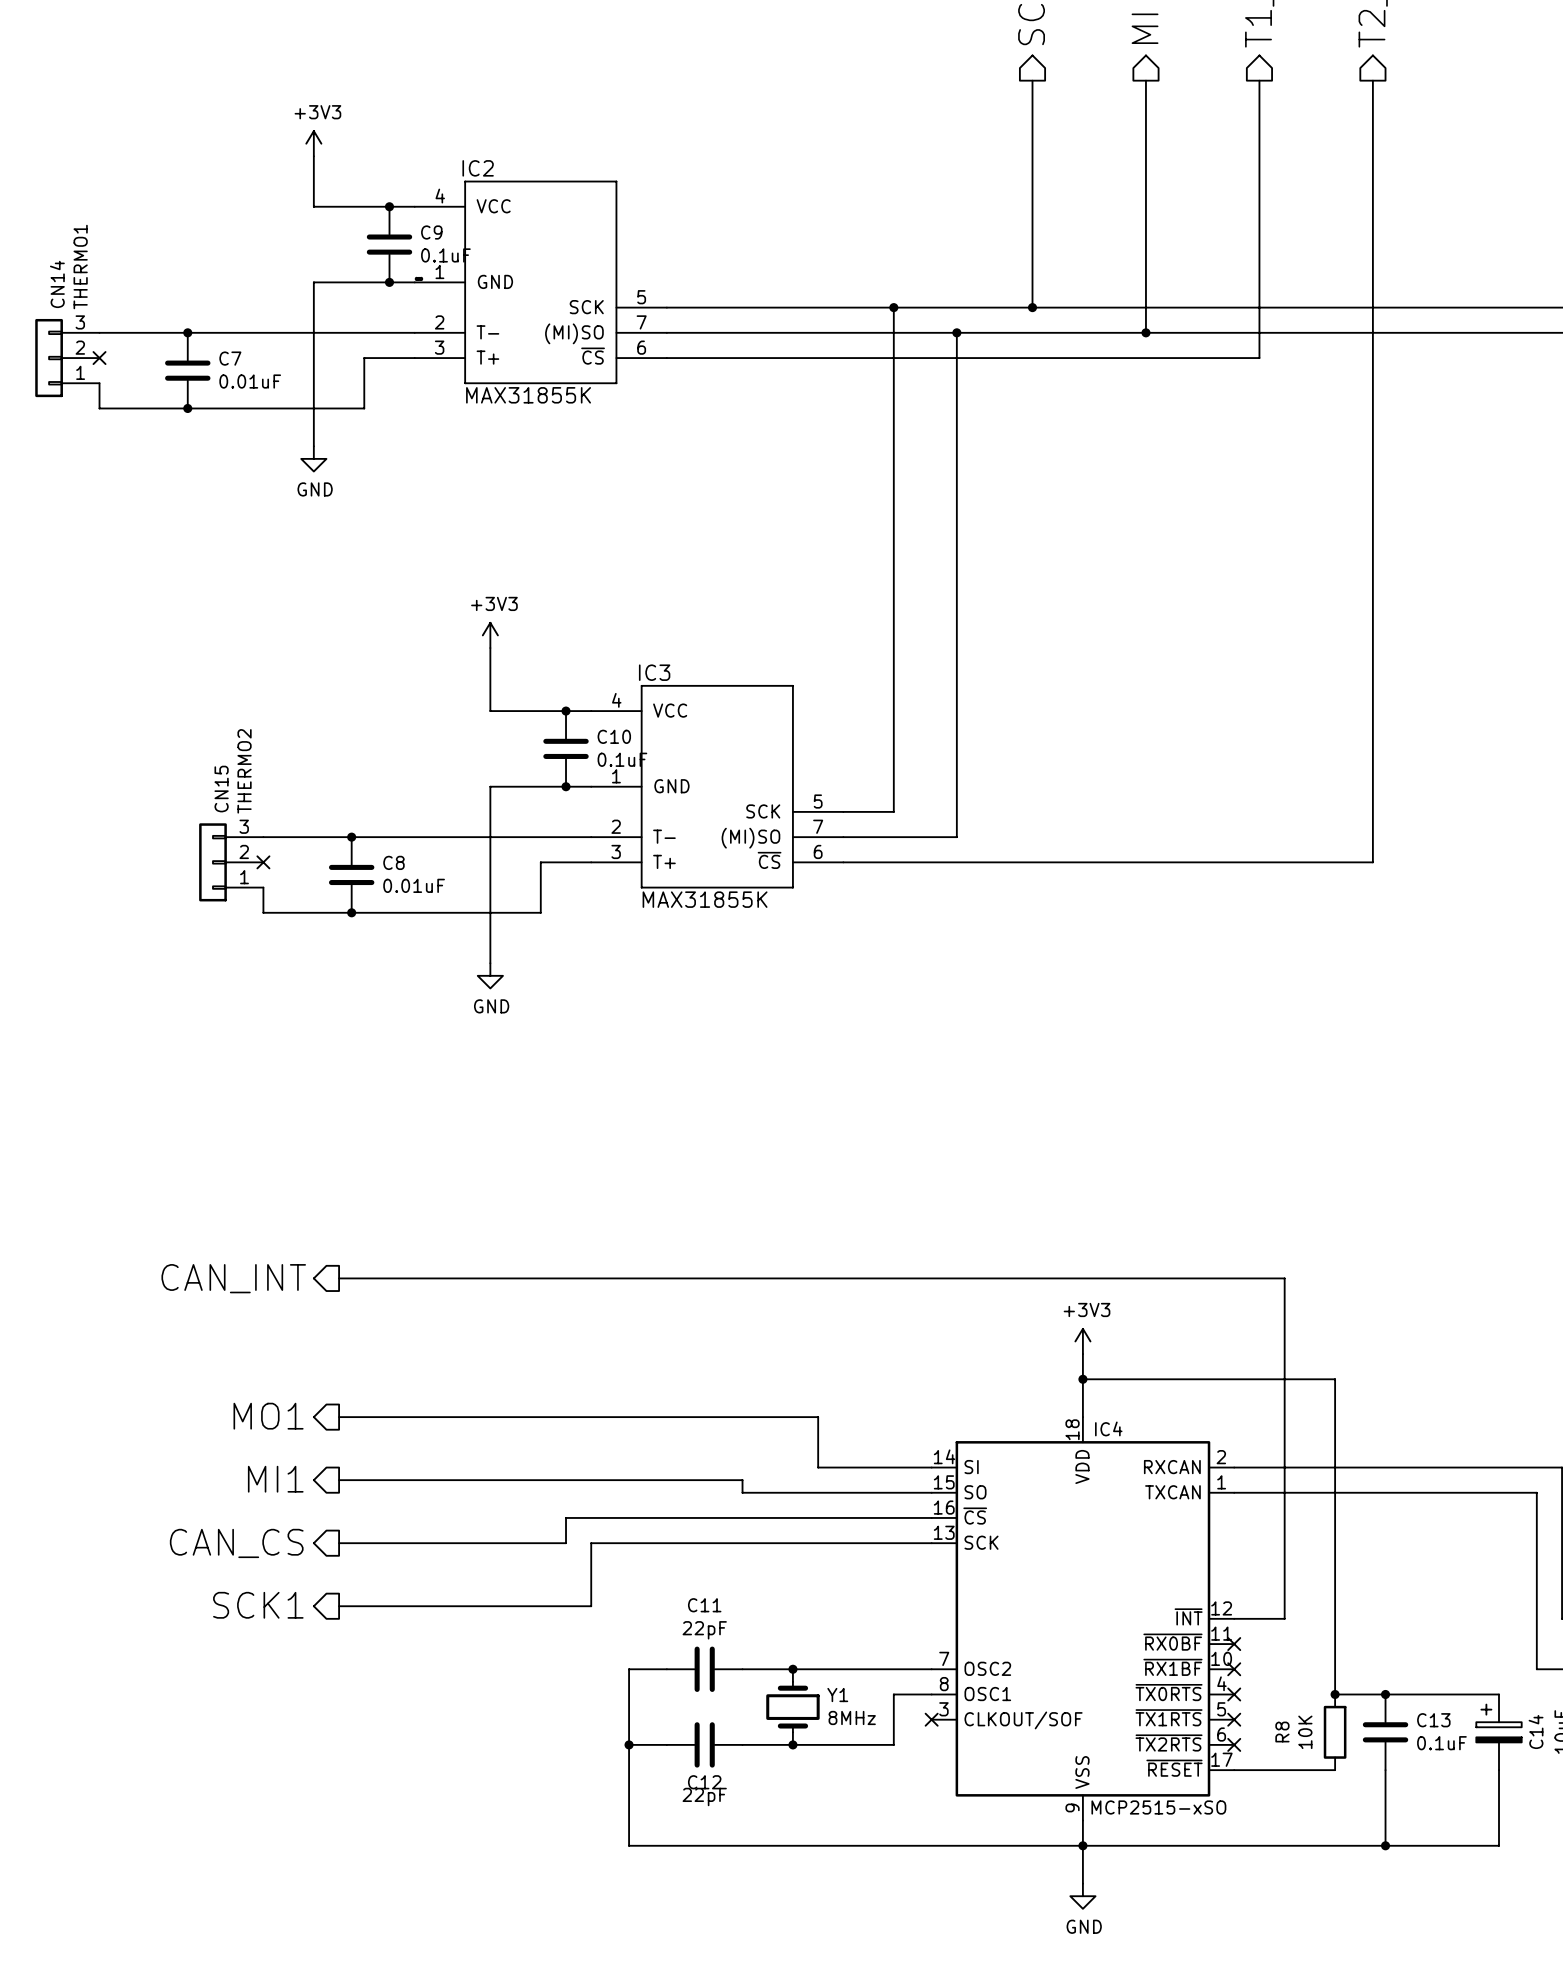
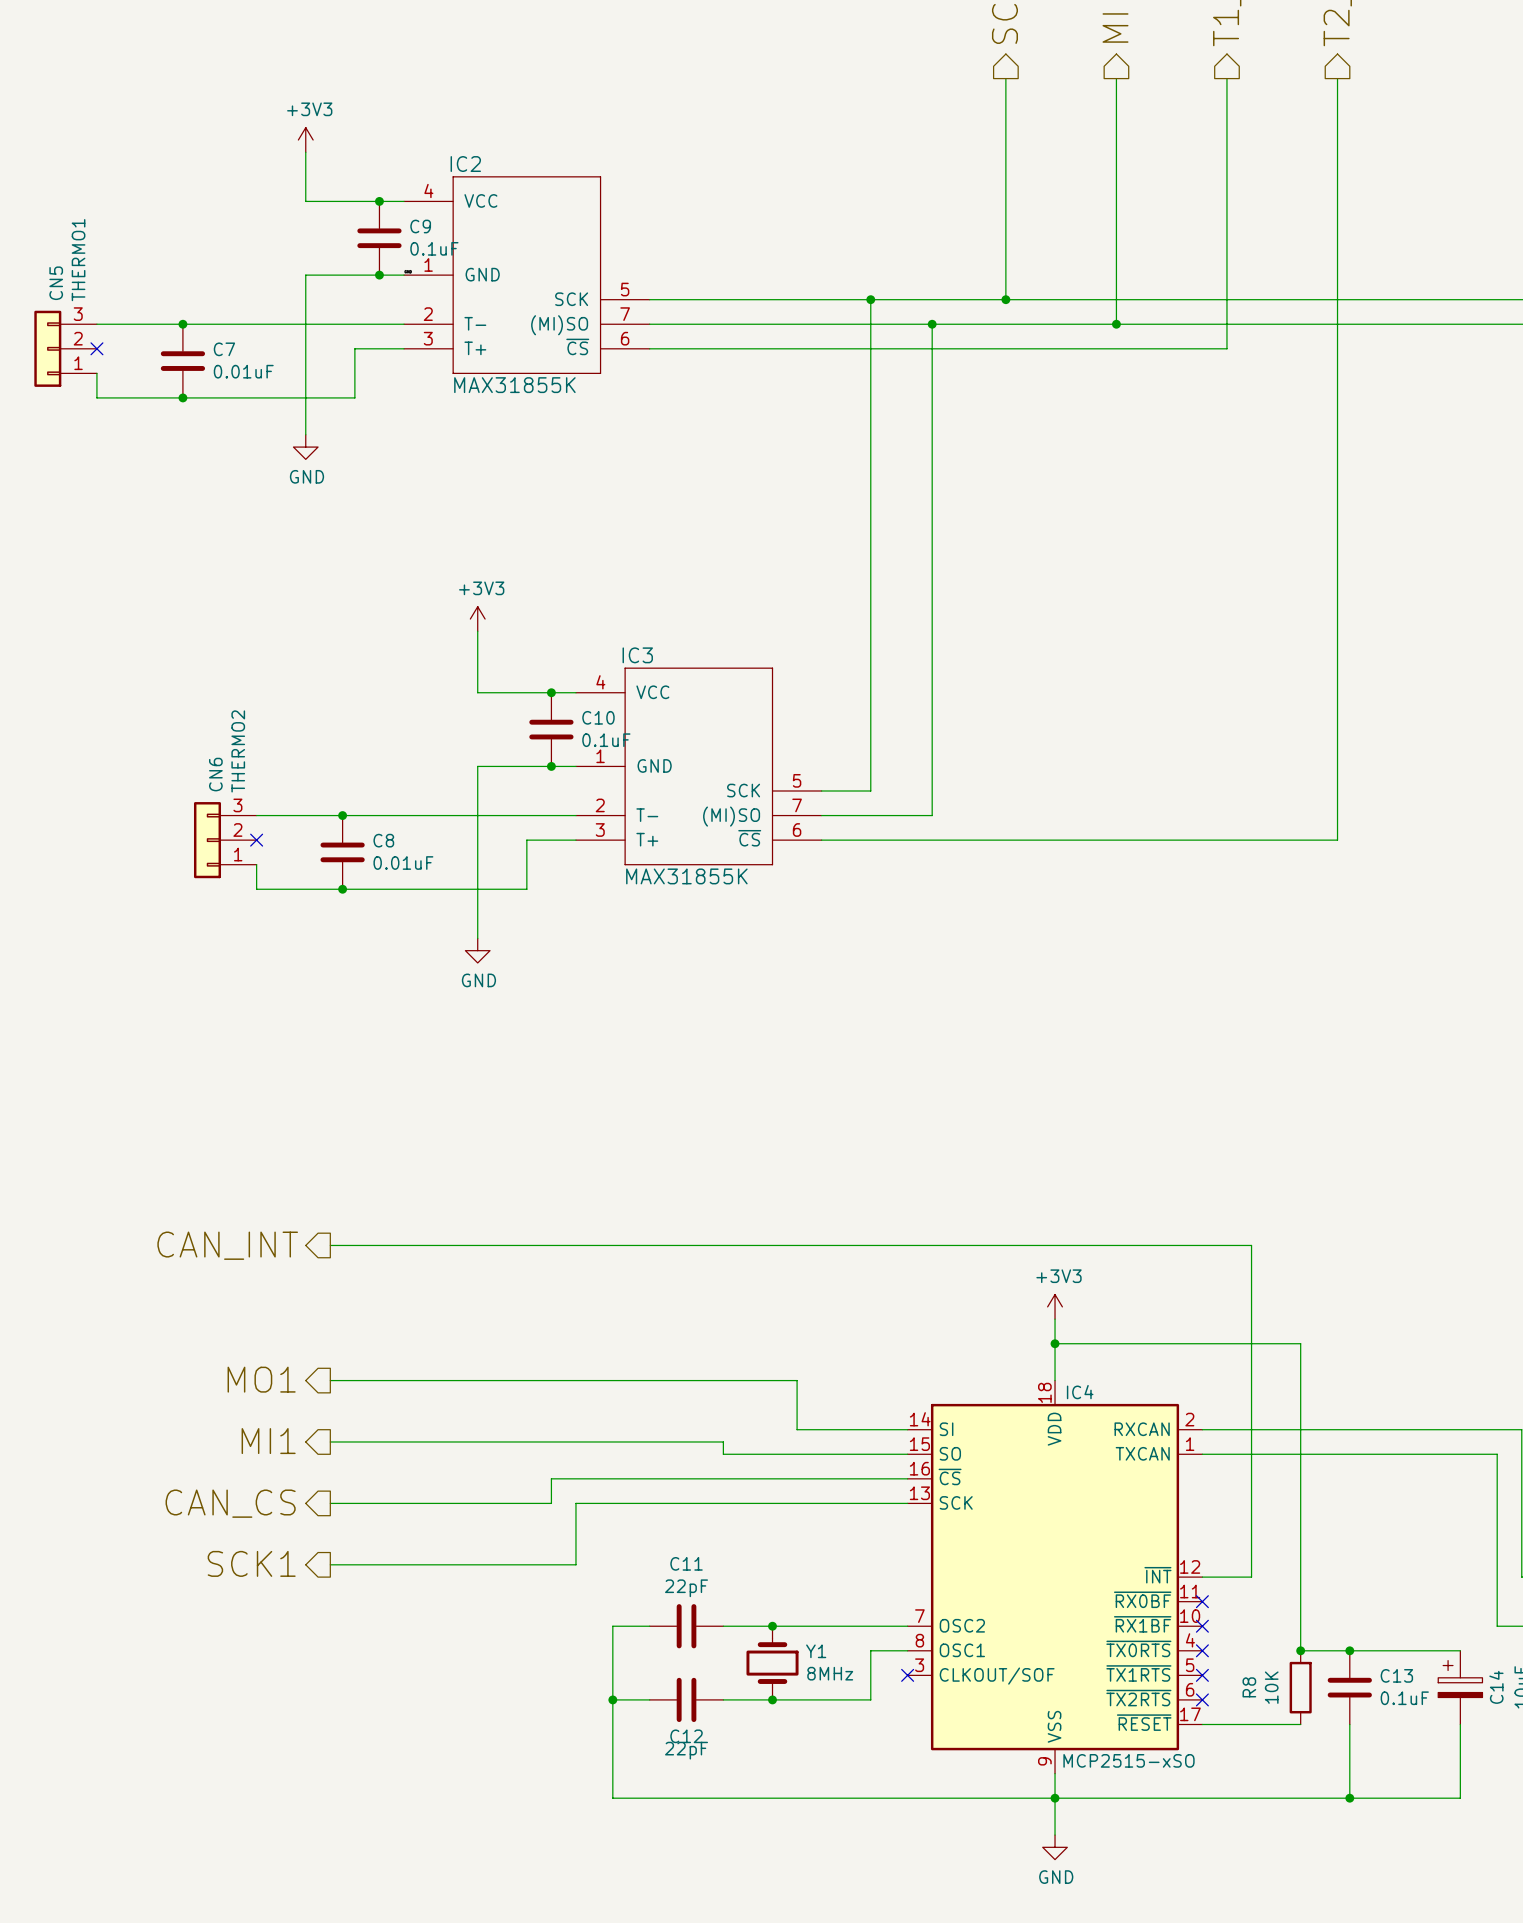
CN14 name: CN14 (57, 284) -> CN5 (56, 283)
CN15 name: CN15 (221, 789) -> CN6 (215, 774)

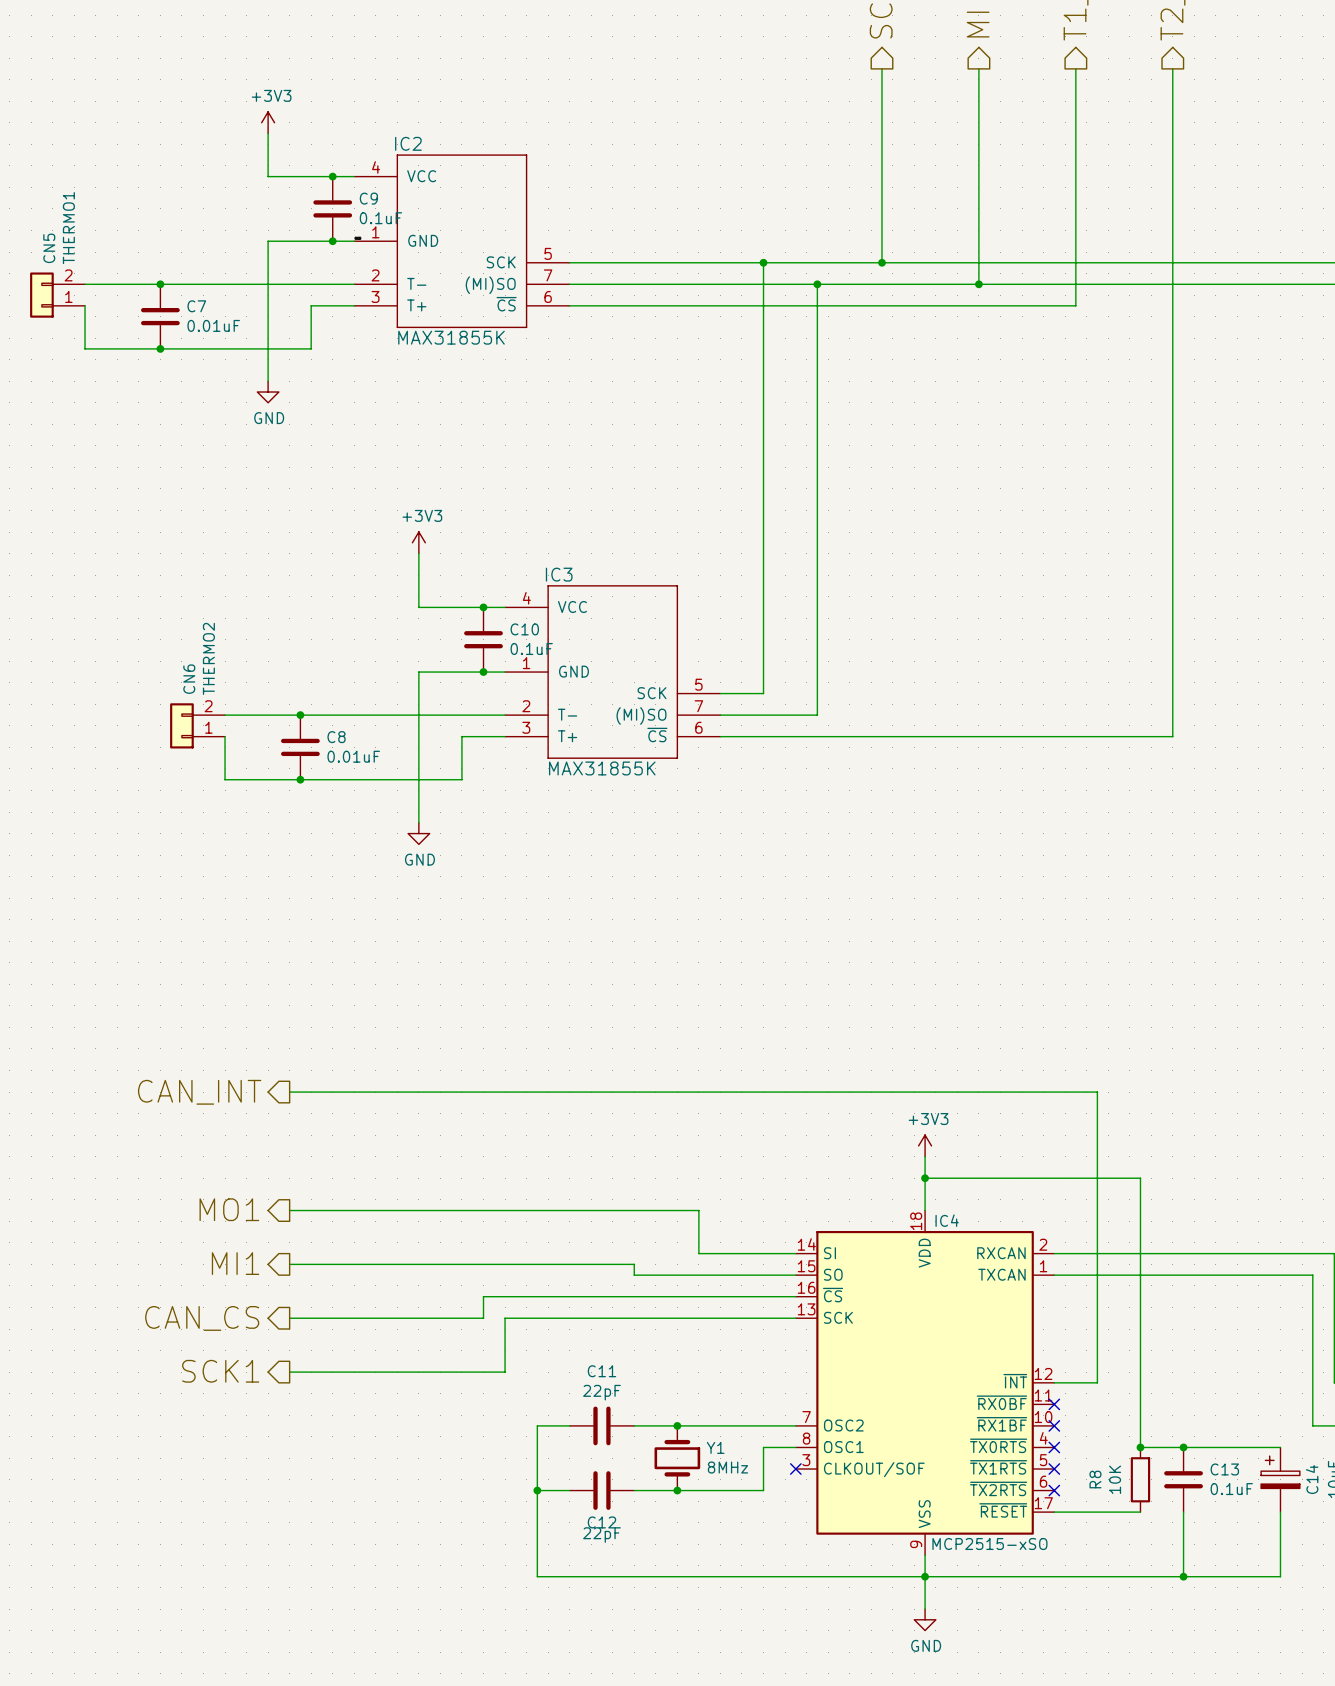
CN5 symbol: [34, 310, 97, 387] -> [30, 272, 86, 318]
wire: none -> (85, 305) (85, 327)
no-connect mark: (96, 348) -> none
CN6 symbol: [193, 802, 257, 879] -> [170, 703, 226, 749]
wire: none -> (225, 736) (225, 758)
no-connect mark: (256, 840) -> none

